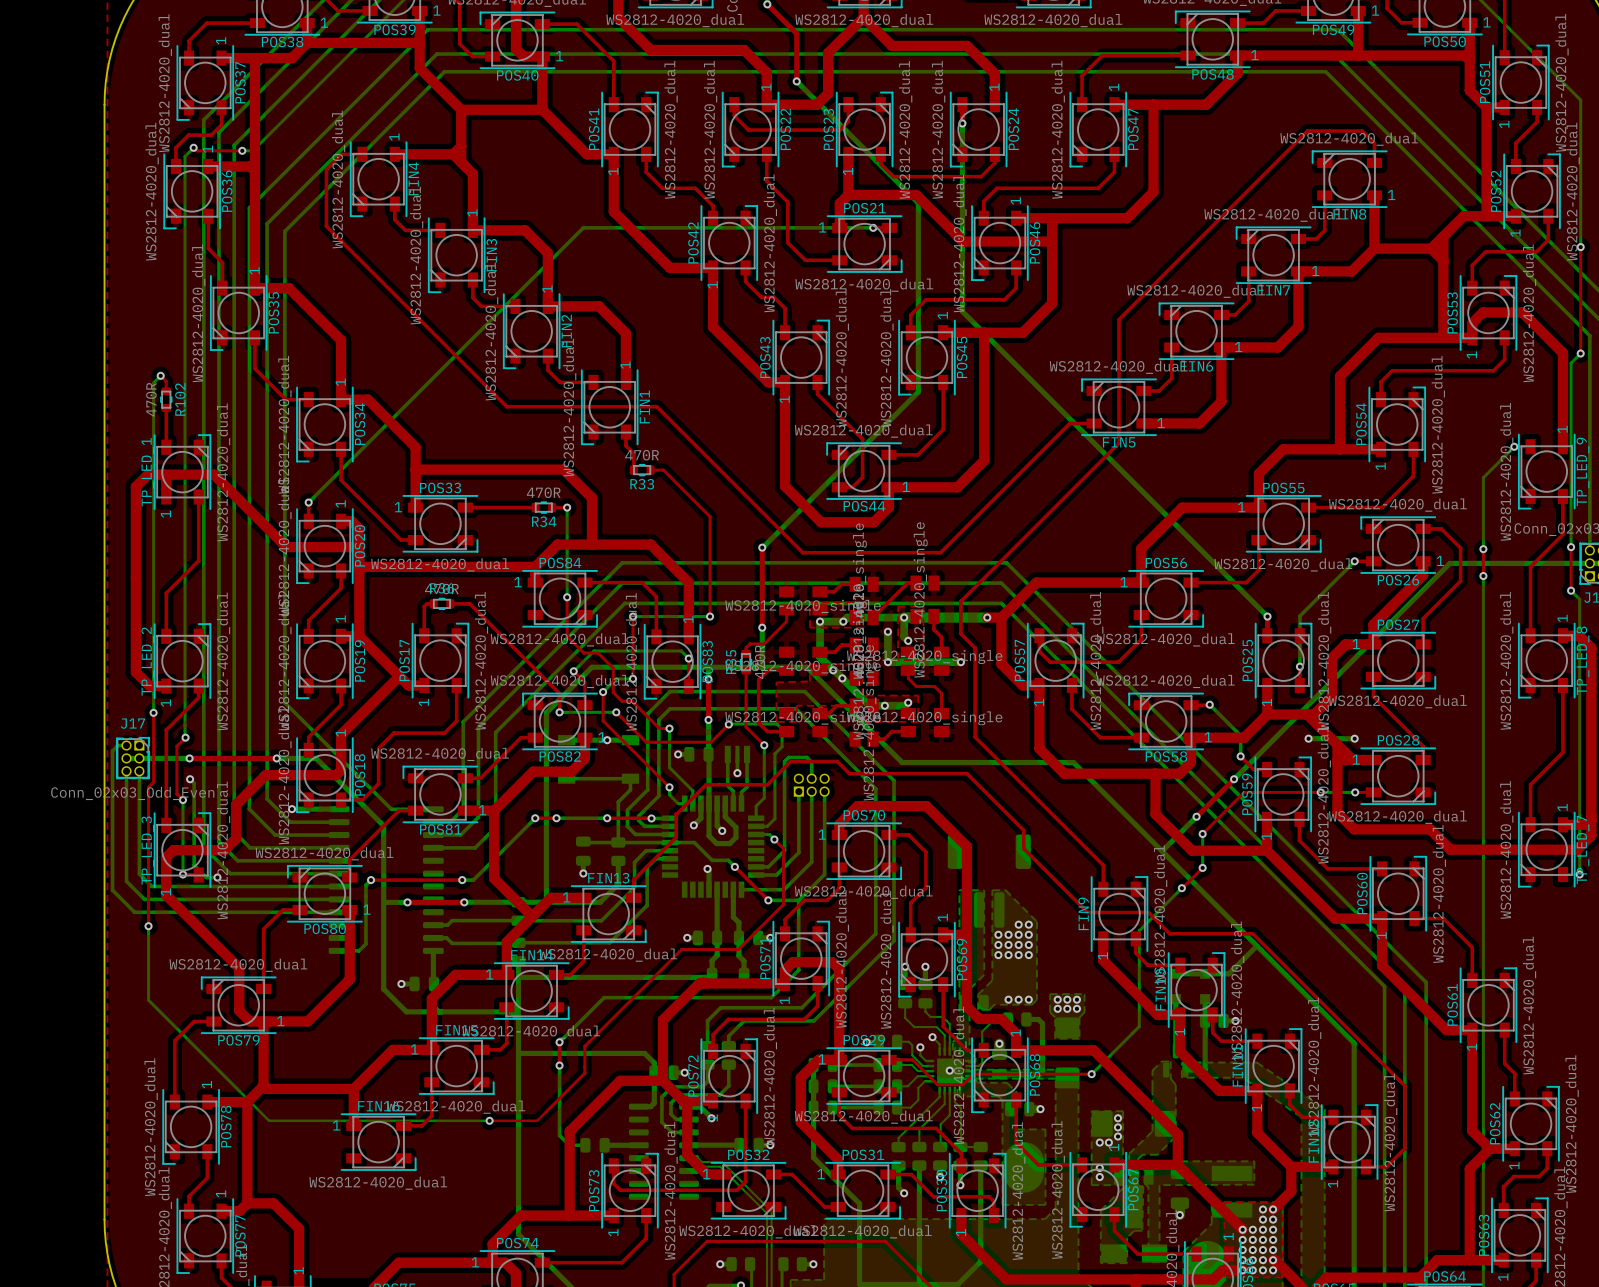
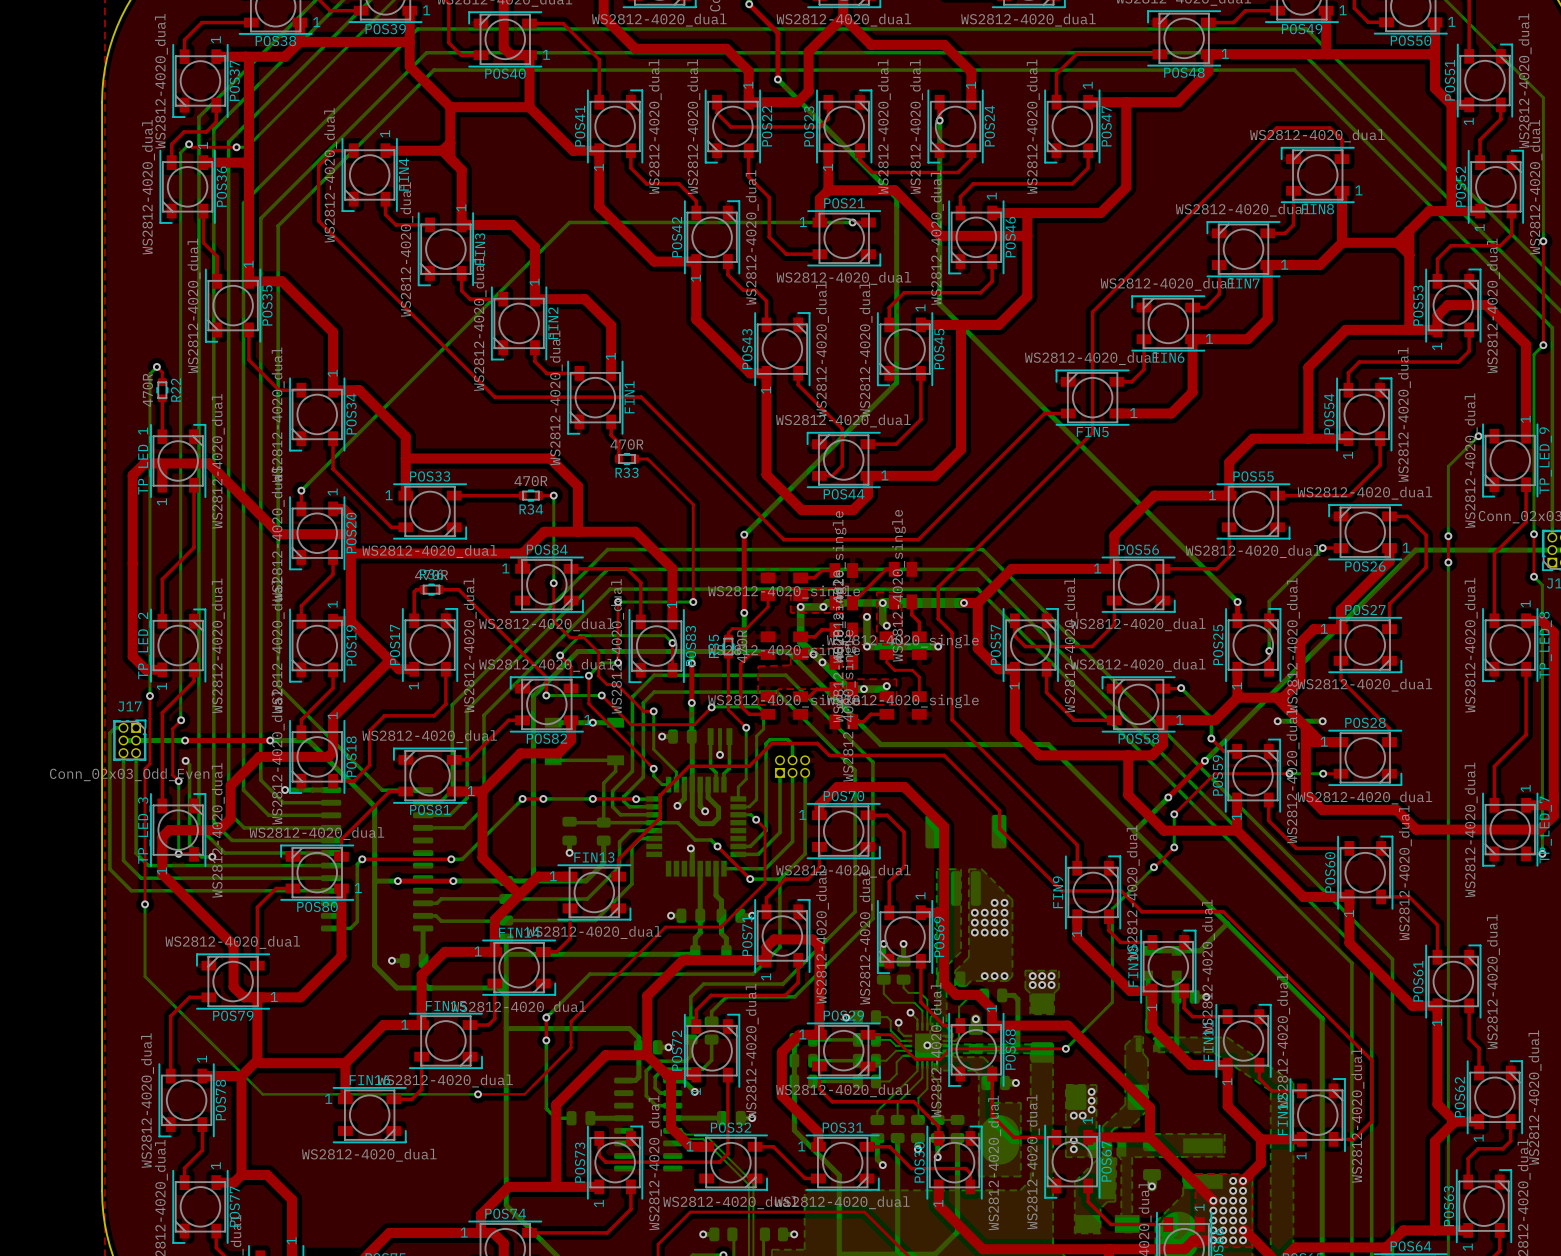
R102 name: R102 (180, 399) -> R22 (176, 390)

